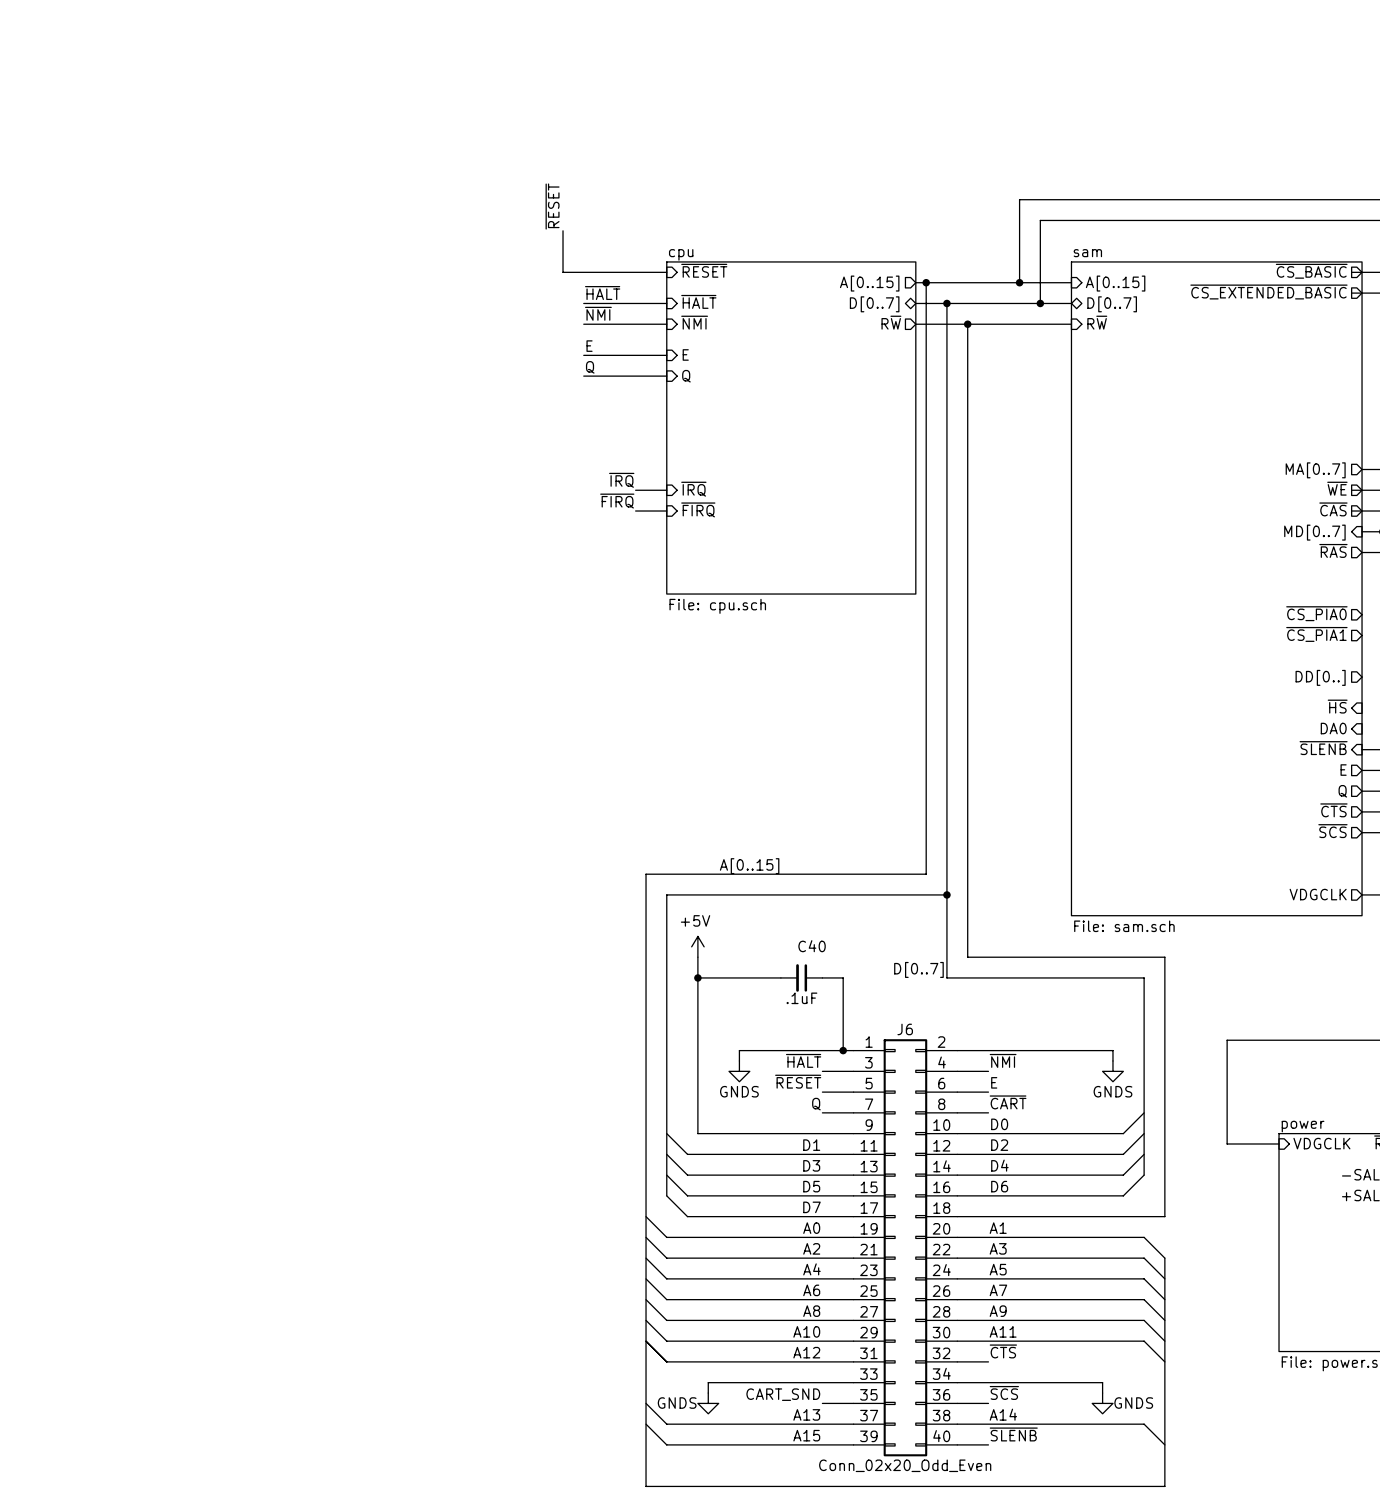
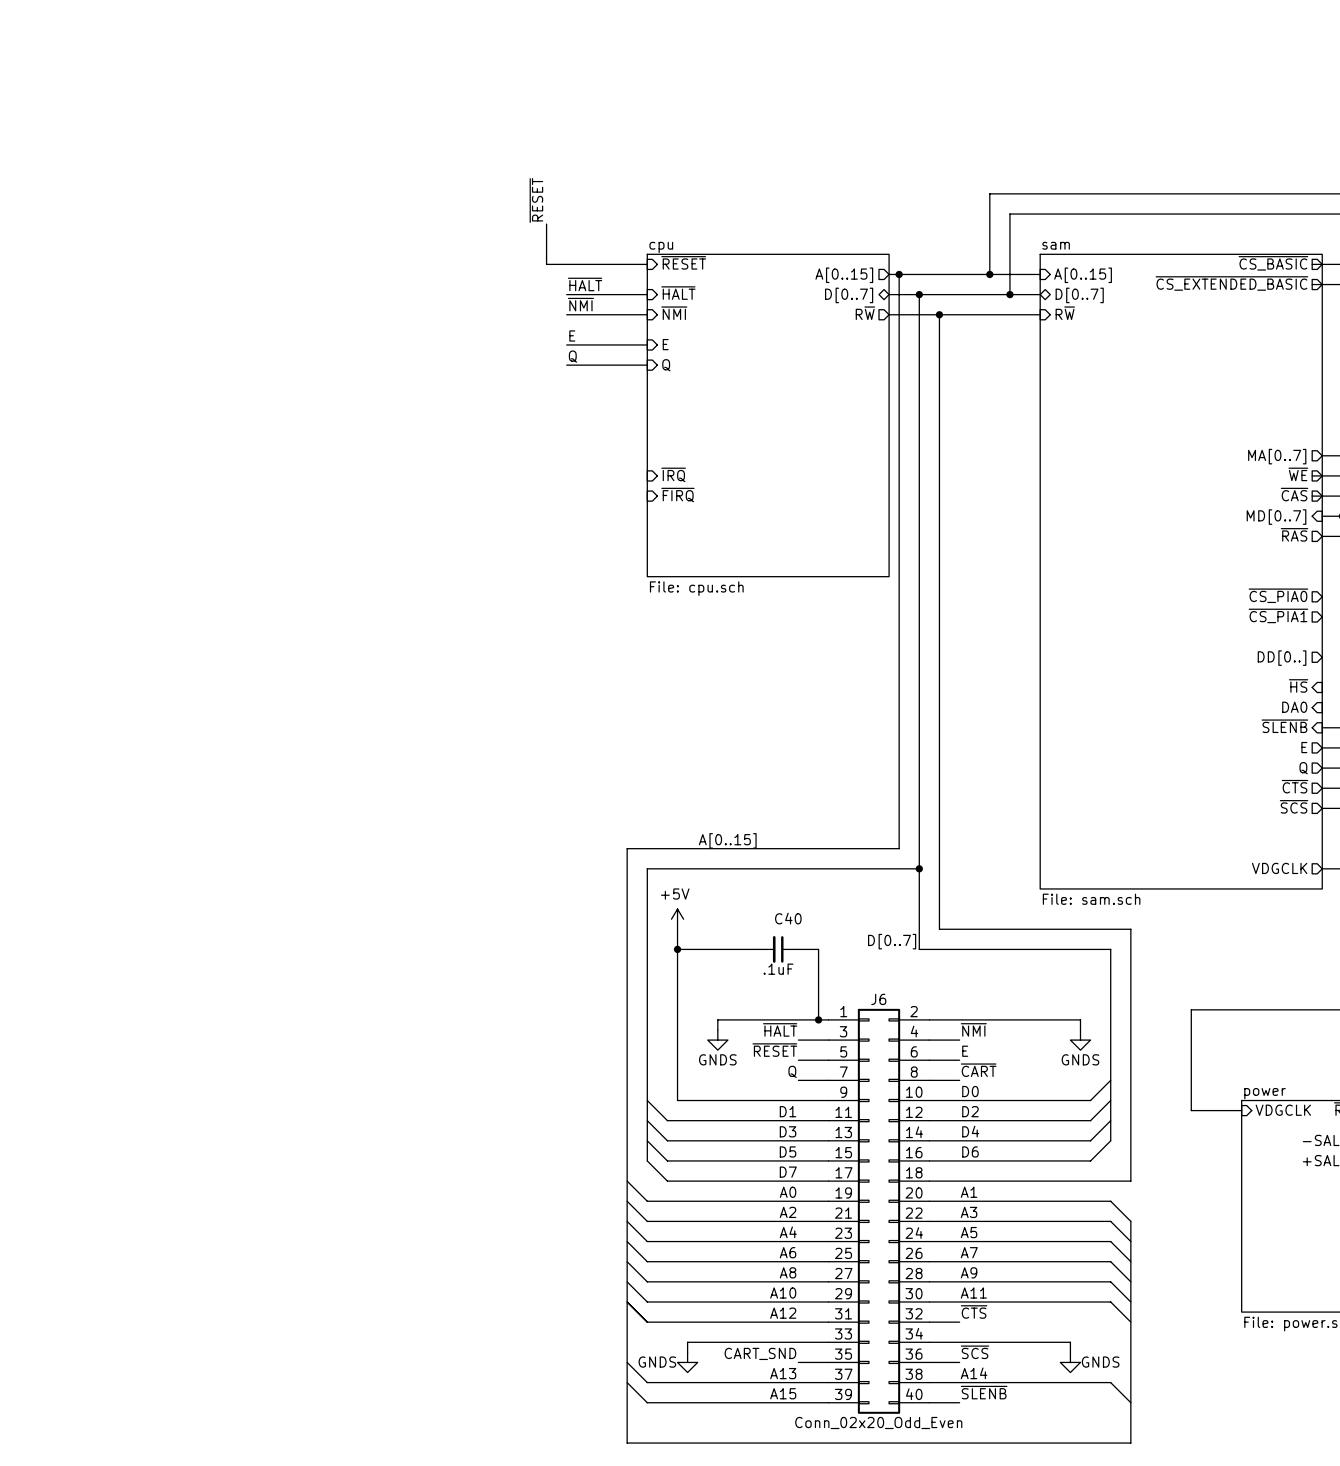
label: ~{IRQ} (621, 480) -> none
wire: (635, 490) (666, 490) -> none
label: ~{FIRQ} (617, 501) -> none
wire: (635, 511) (666, 511) -> none

